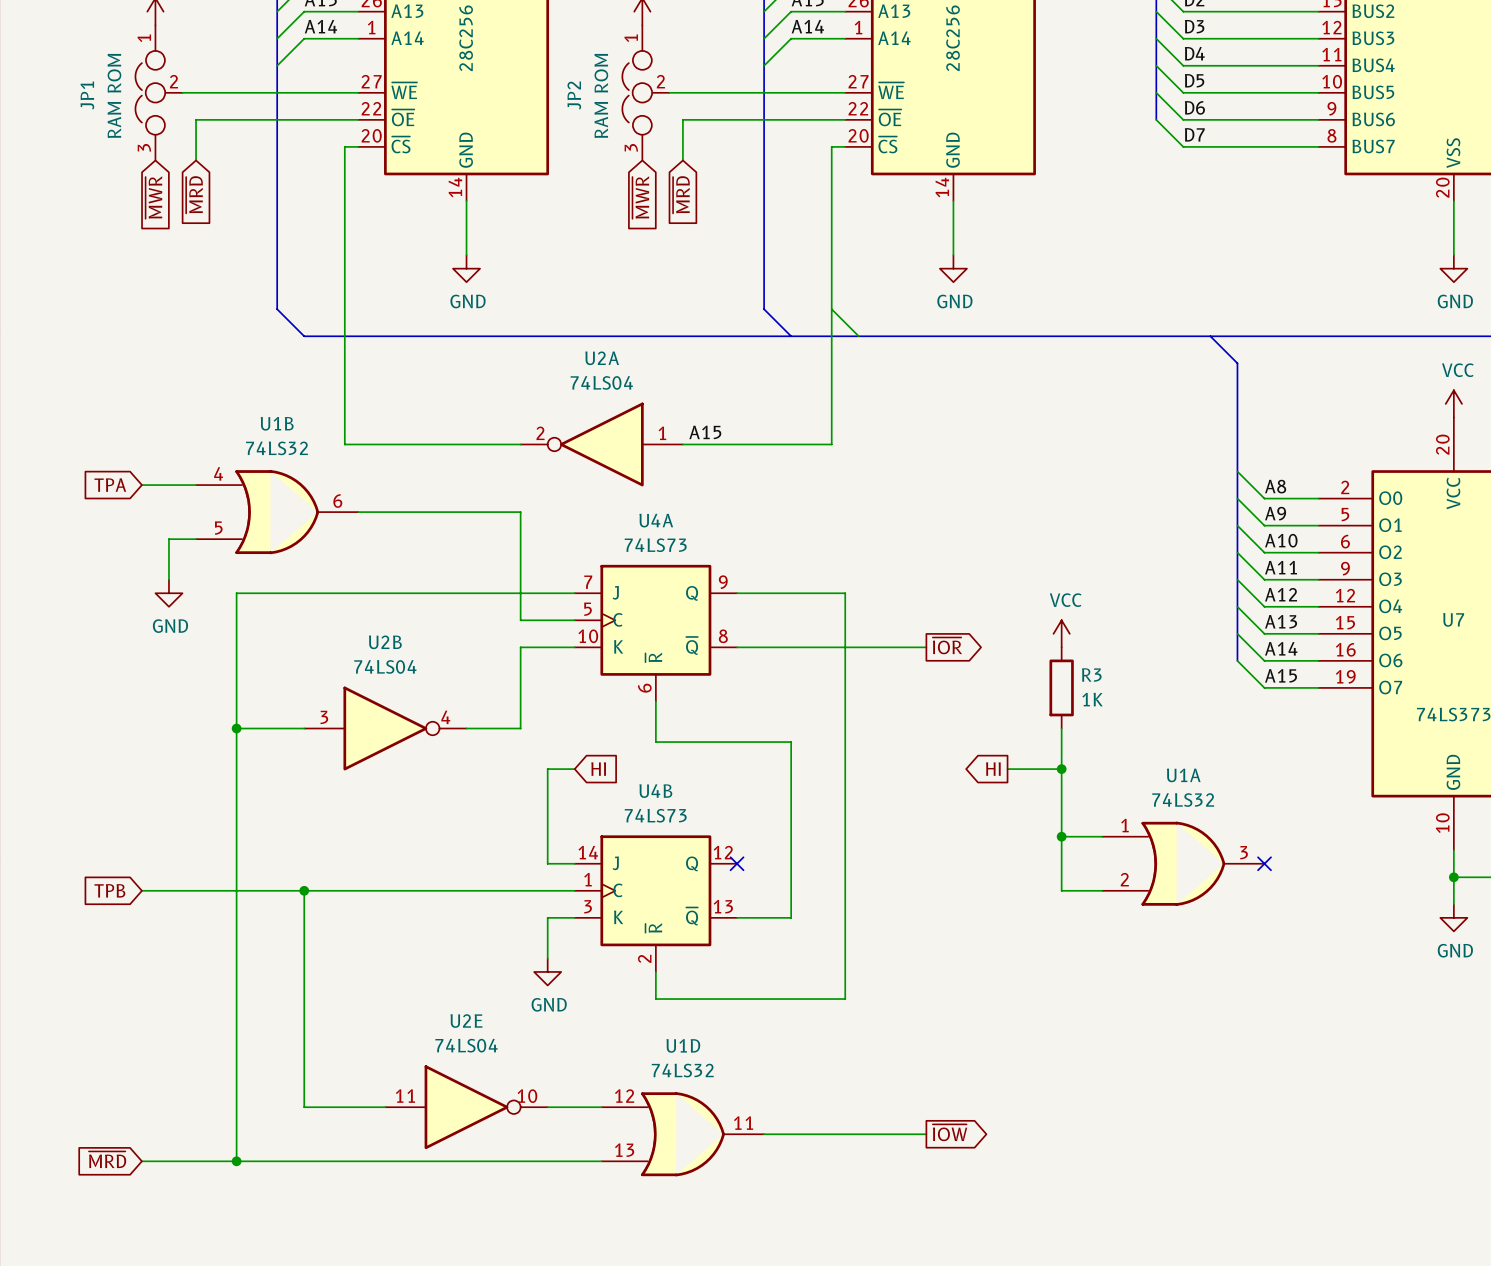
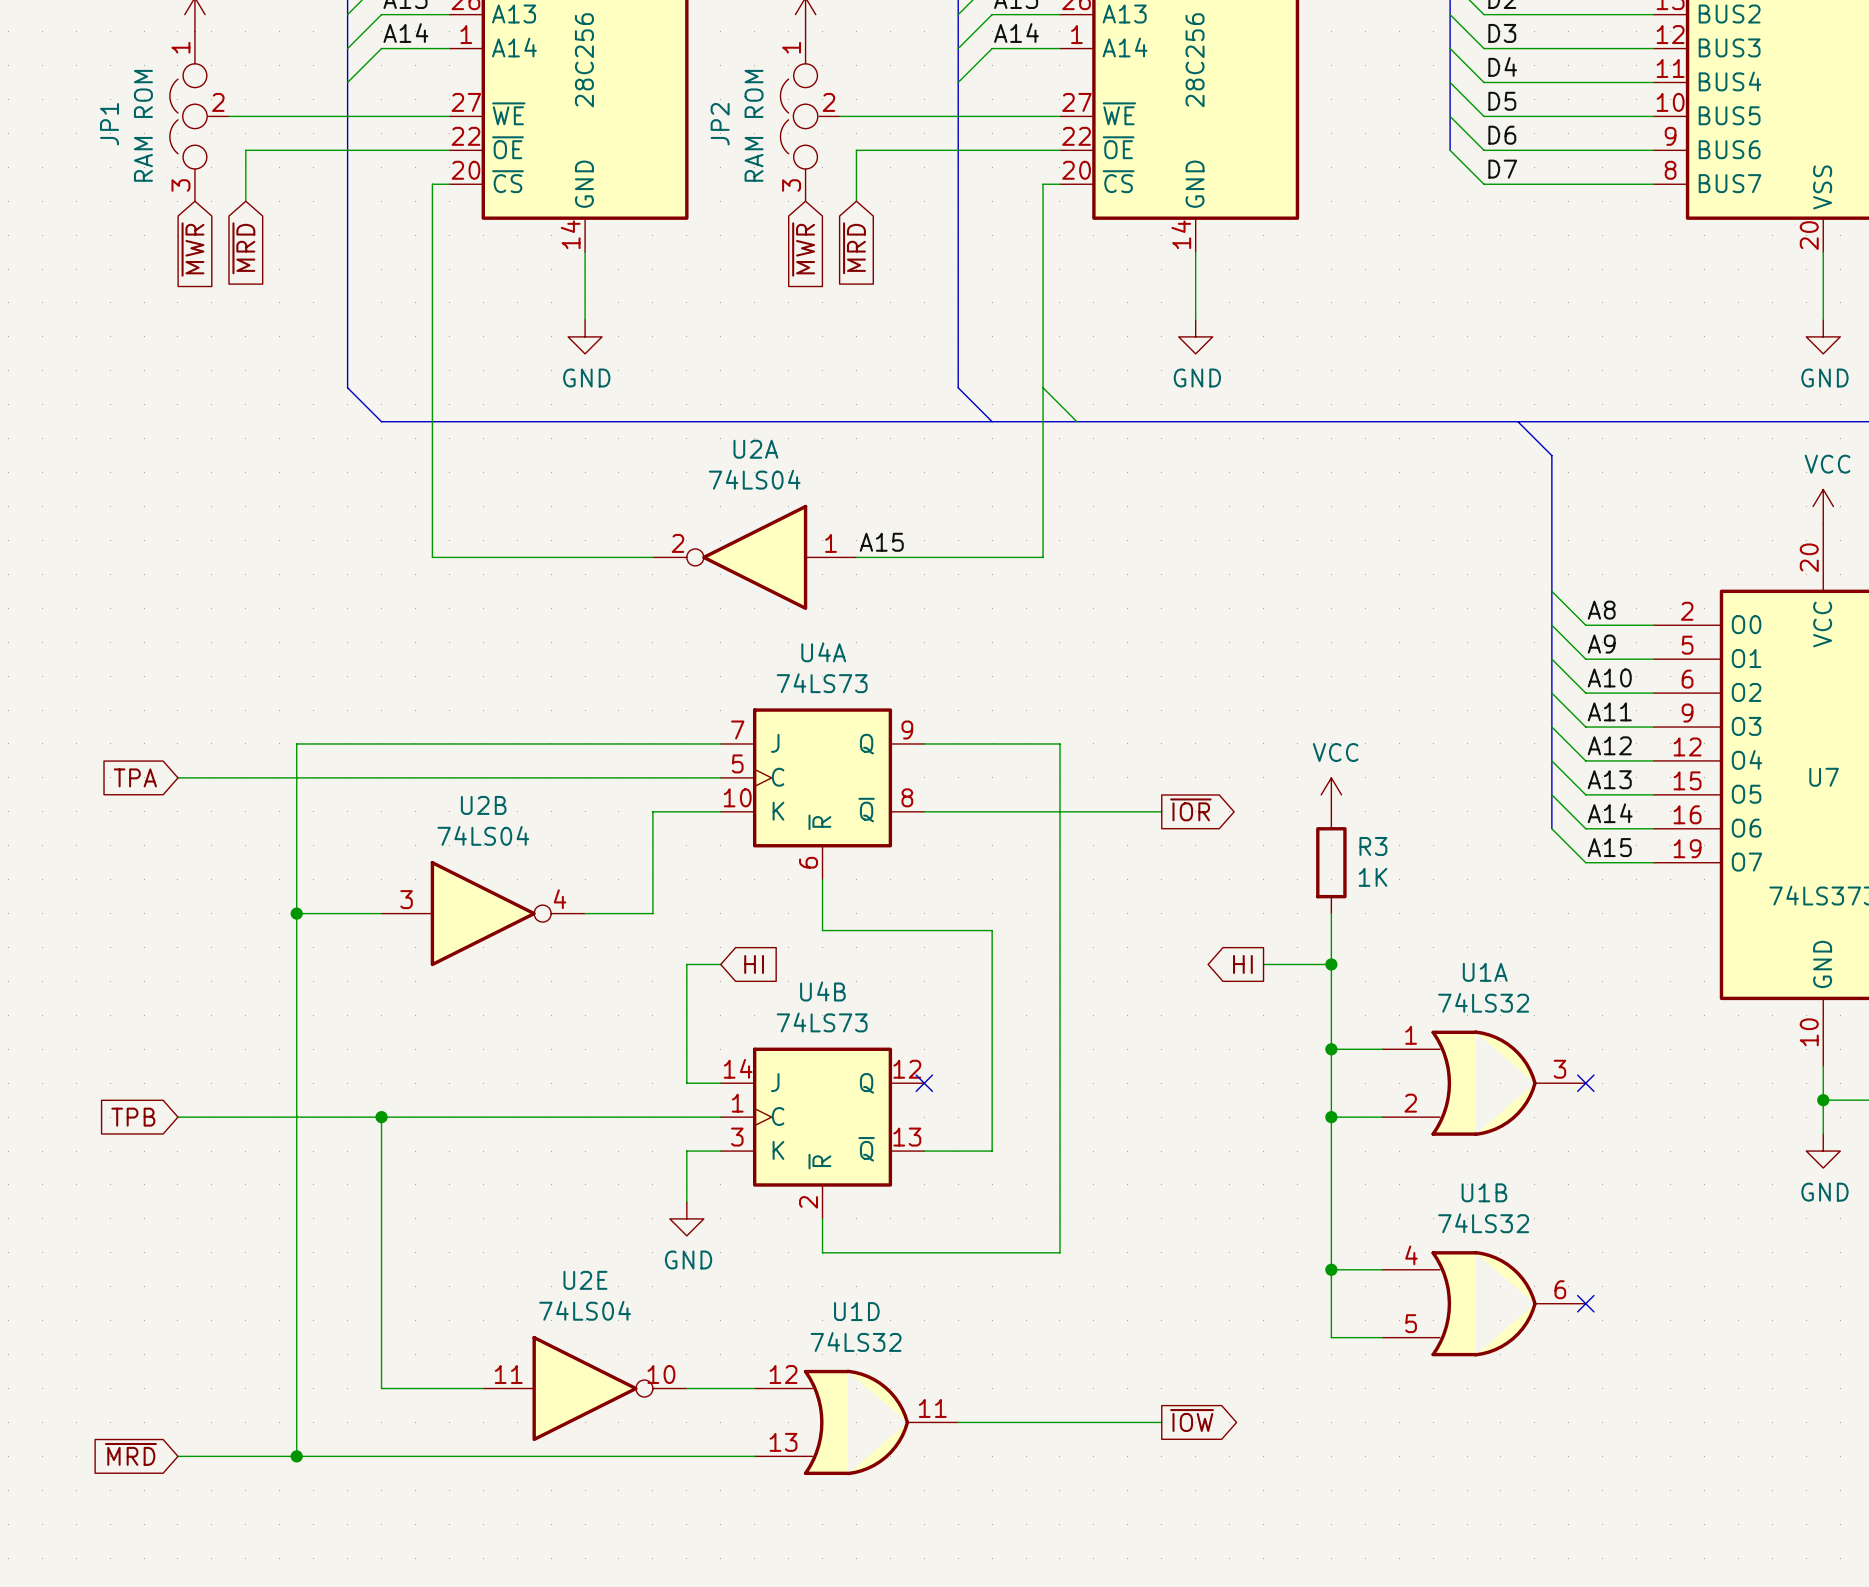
global label position: TPA (110, 485) -> TPA (135, 777)
wire: (141, 485) (196, 485) -> none
U1B position: (277, 512) -> (1484, 1303)
wire: (358, 512) (520, 512) (520, 620) -> (177, 777) (652, 777)
wire: (196, 539) (168, 539) (168, 579) -> none
power symbol: GND (168, 593) -> none
wire: none -> (1331, 1117) (1331, 1337) (1382, 1337)
junction: none -> (1331, 1117)
wire: none -> (1331, 1269) (1382, 1269)
junction: none -> (1331, 1269)
no-connect mark: none -> (1585, 1303)

